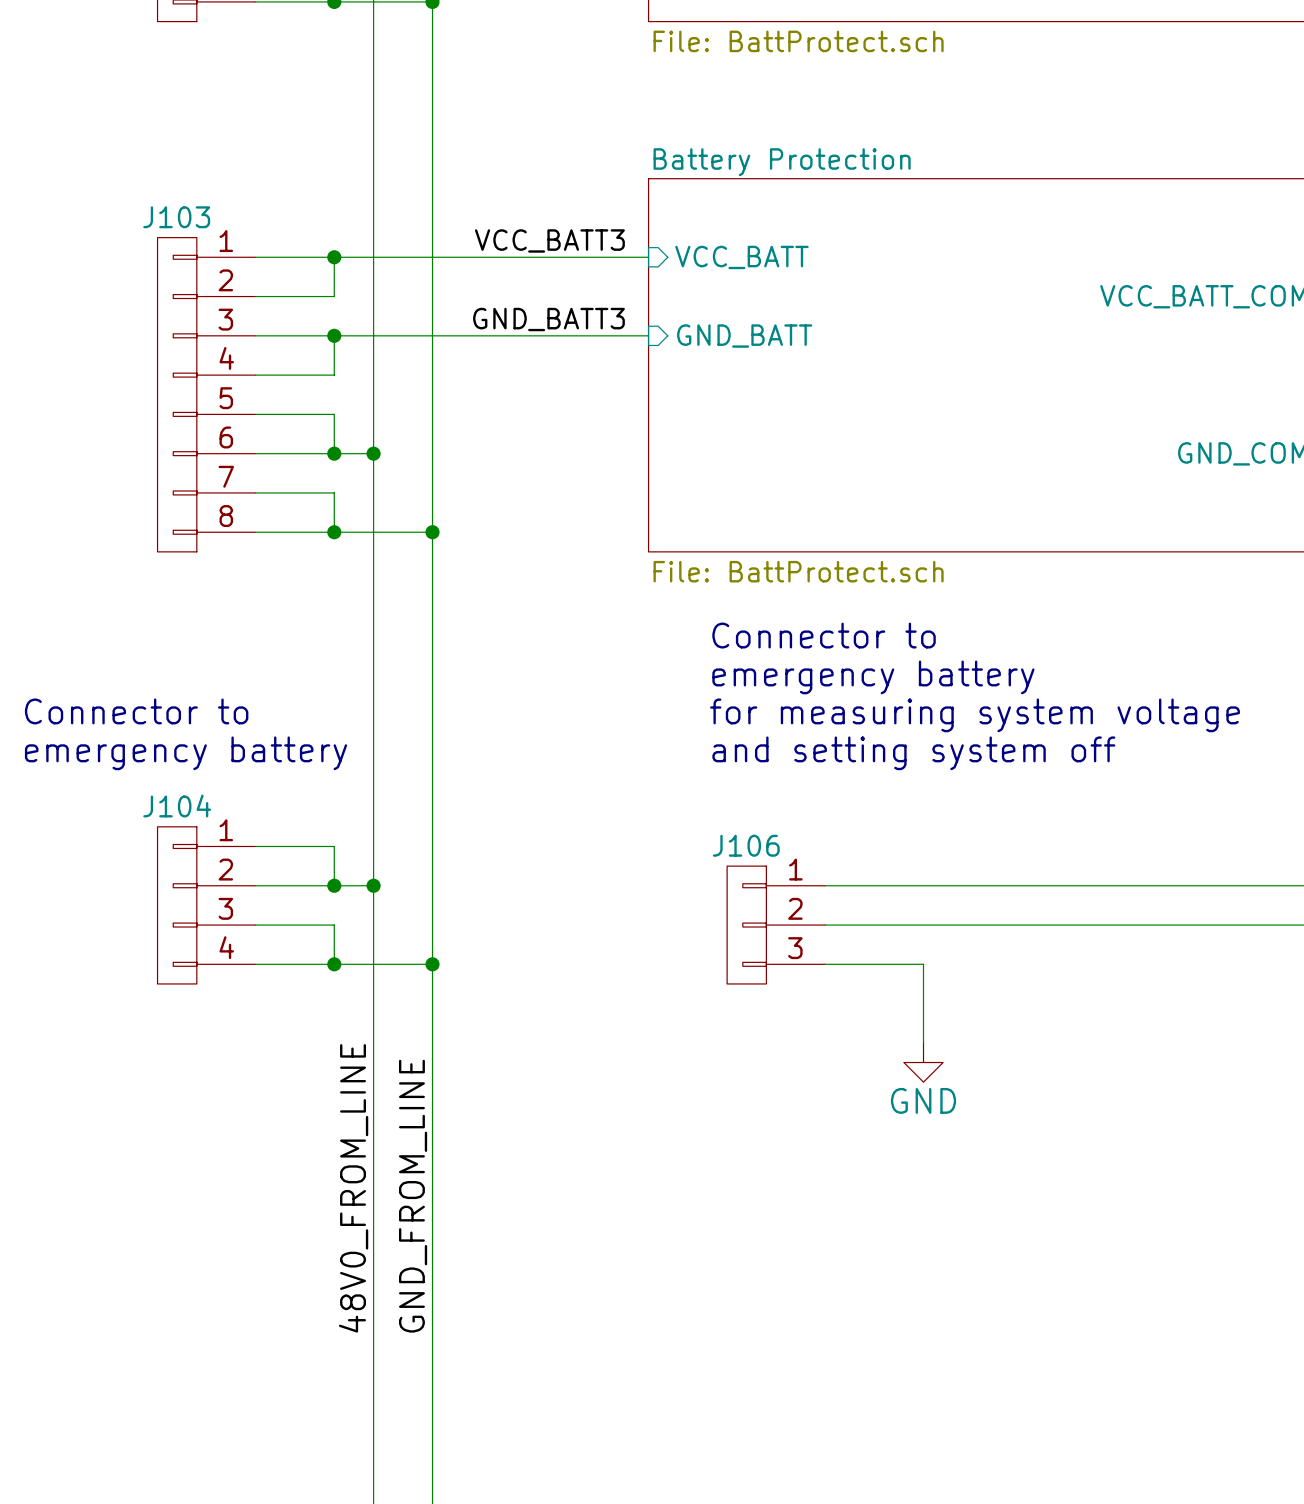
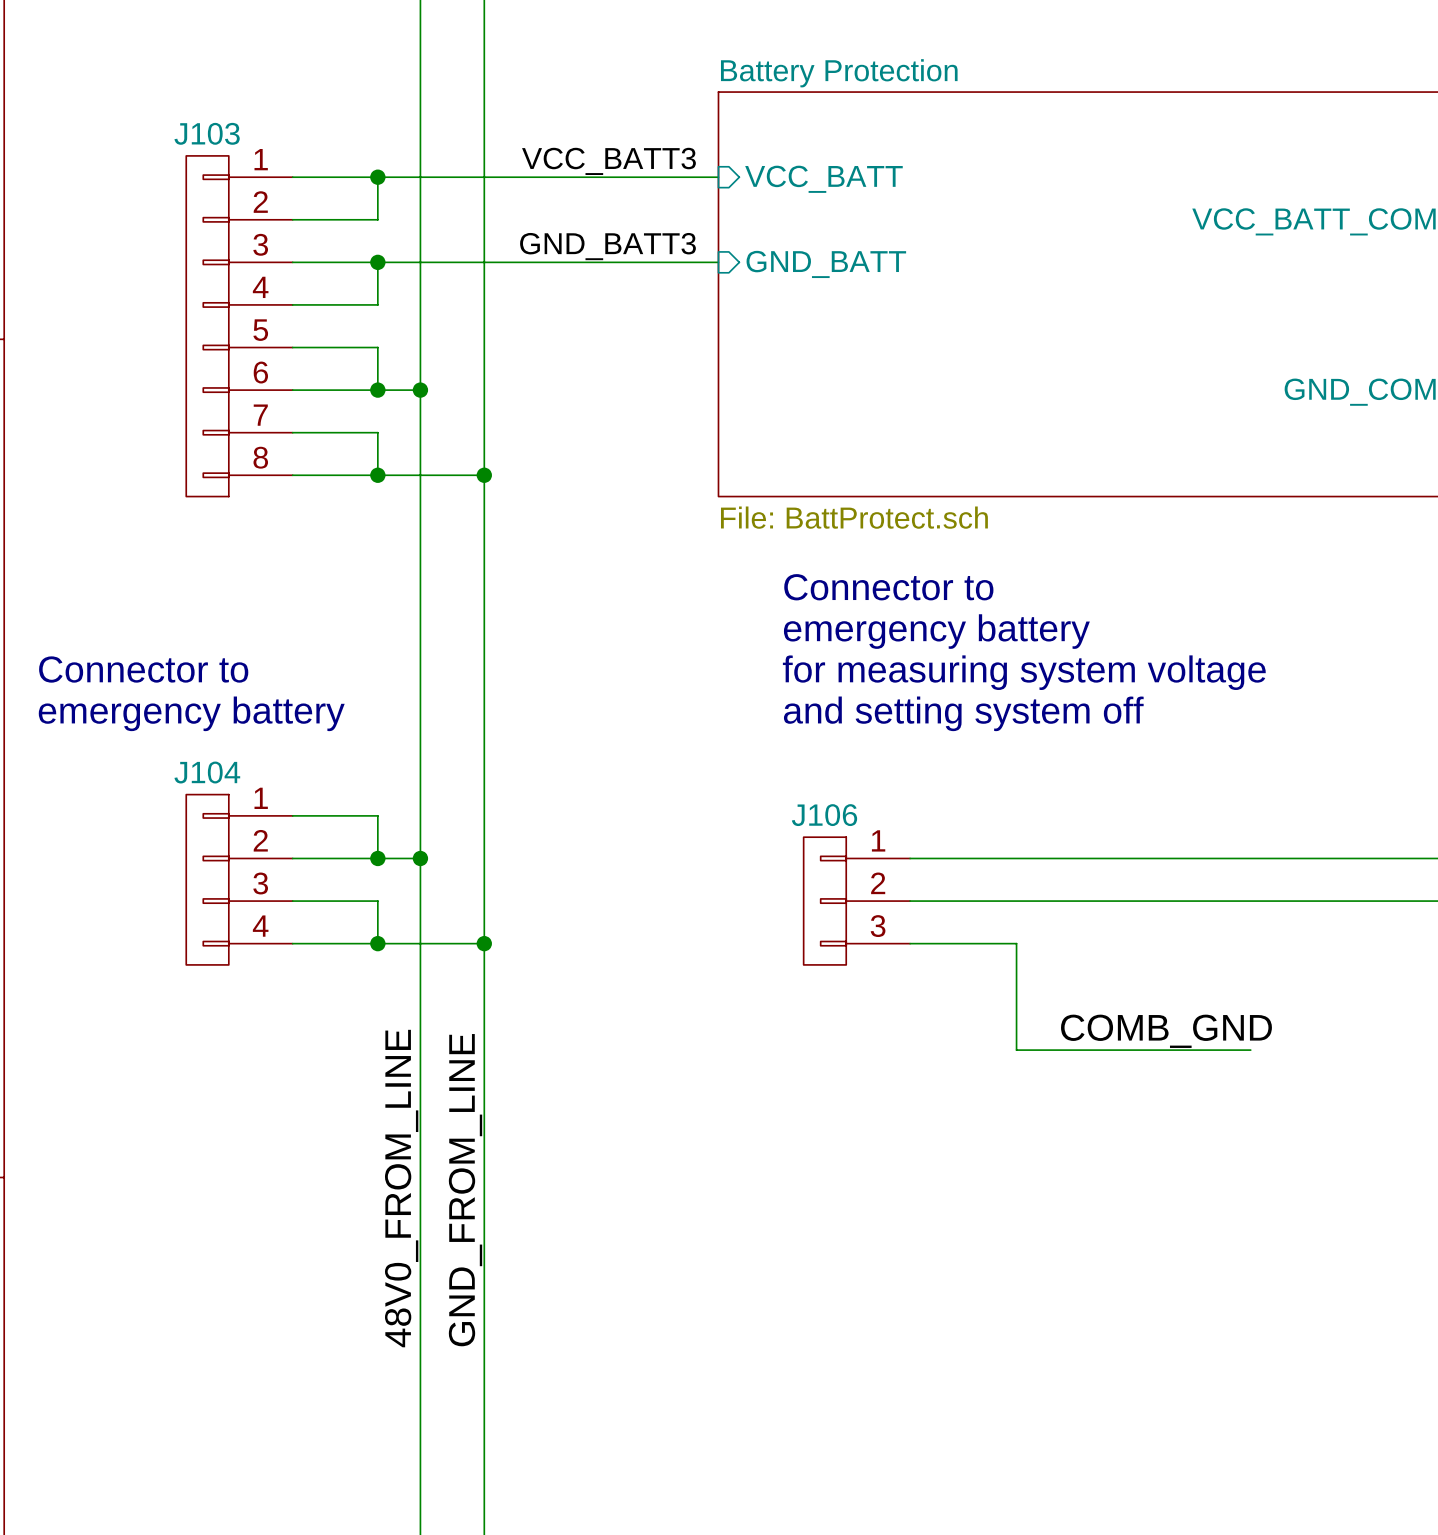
wire: none -> (1016, 1028) (1016, 1050) (1250, 1050)
label: none -> COMB_GND (1166, 1031)
power symbol: GND (923, 1062) -> none

